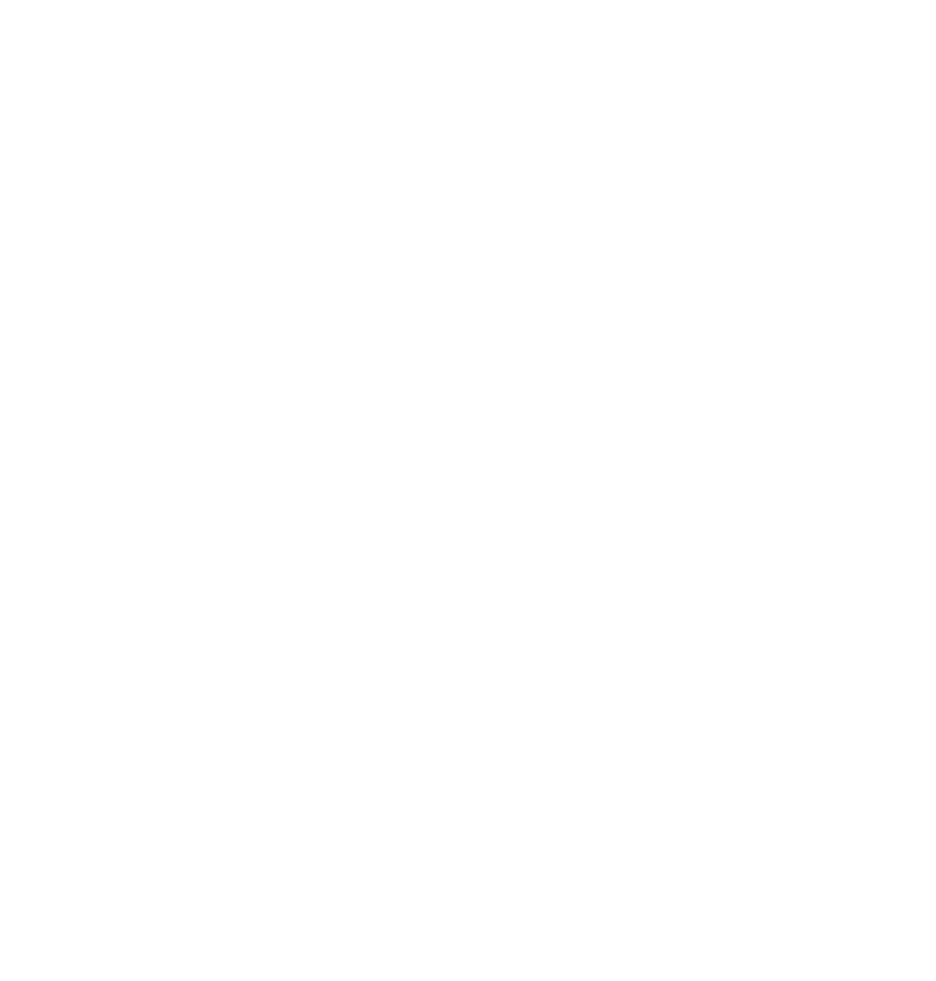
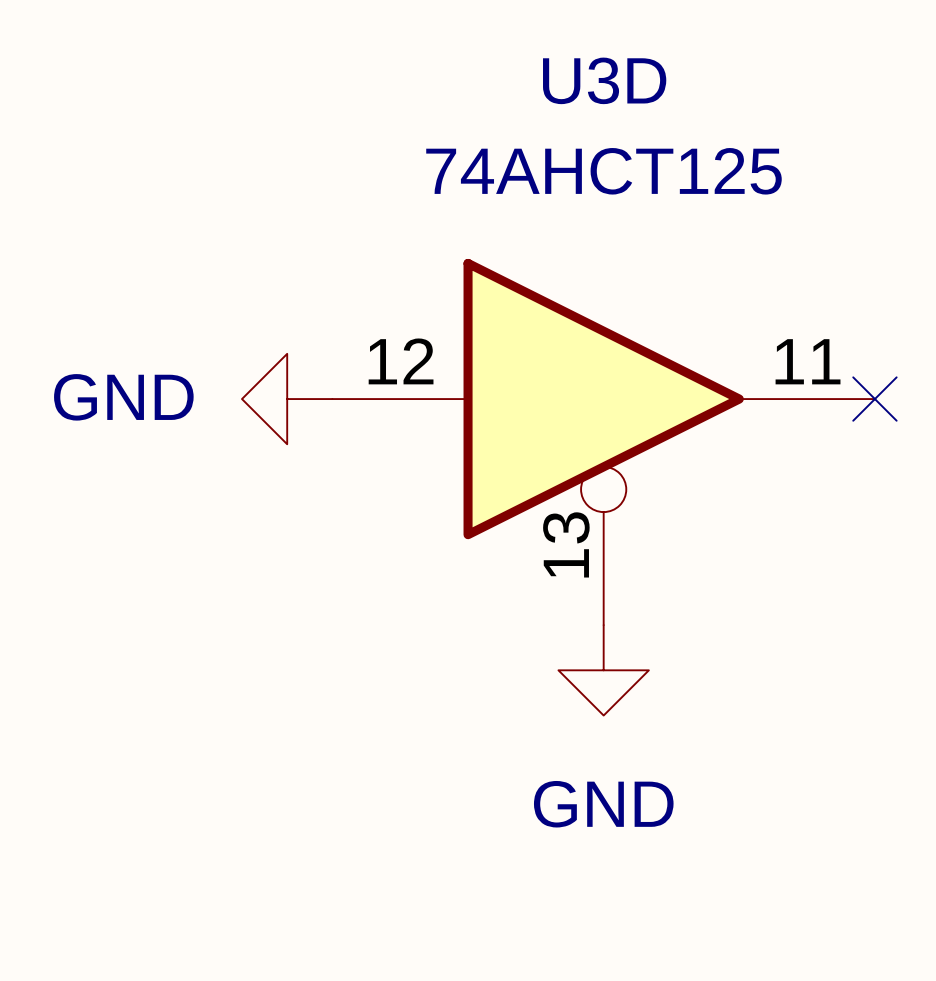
power symbol: none -> GND (287, 399)
no-connect mark: none -> (874, 399)
U3D: none -> 74AHCT125 (603, 441)
power symbol: none -> GND (603, 670)

